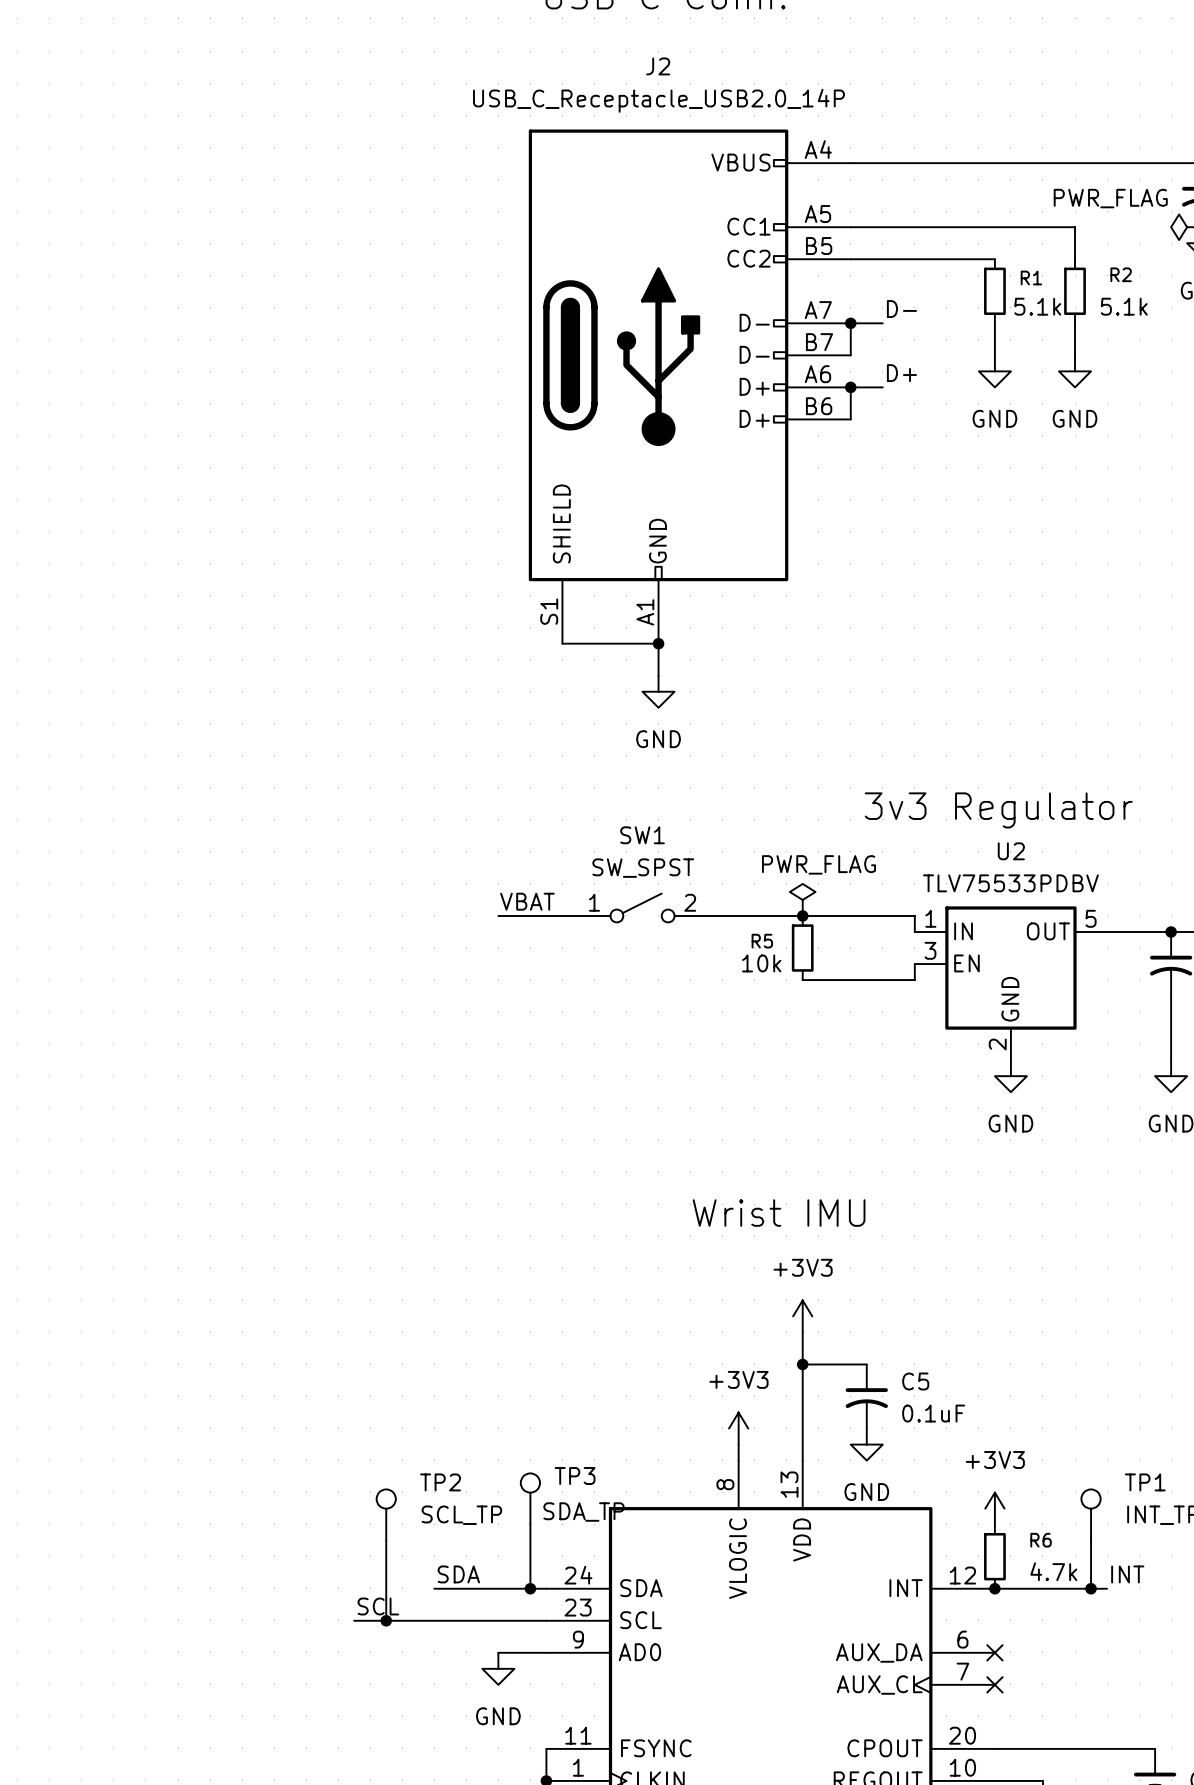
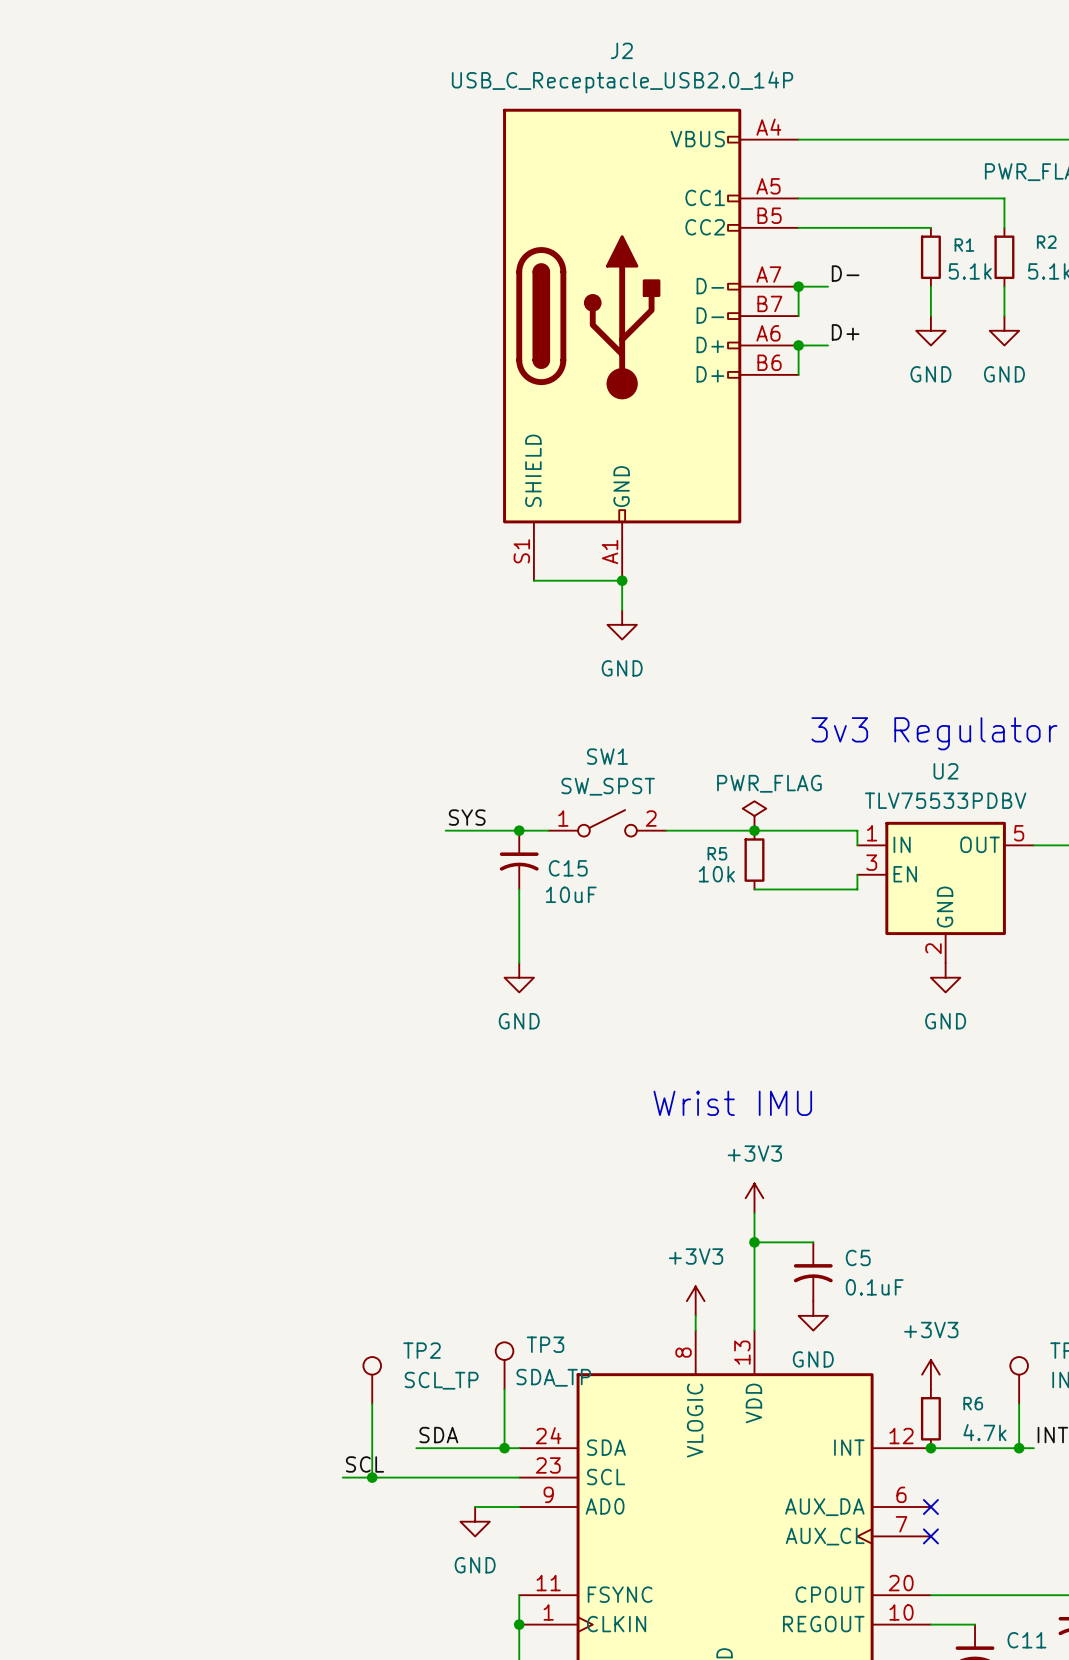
label: none -> SYS (467, 817)
label: VBAT (527, 901) -> none
wire: none -> (445, 830) (475, 830)
junction: none -> (519, 830)
C15: none -> 10uF (519, 860)
wire: none -> (519, 889) (519, 962)
power symbol: none -> GND (519, 977)

